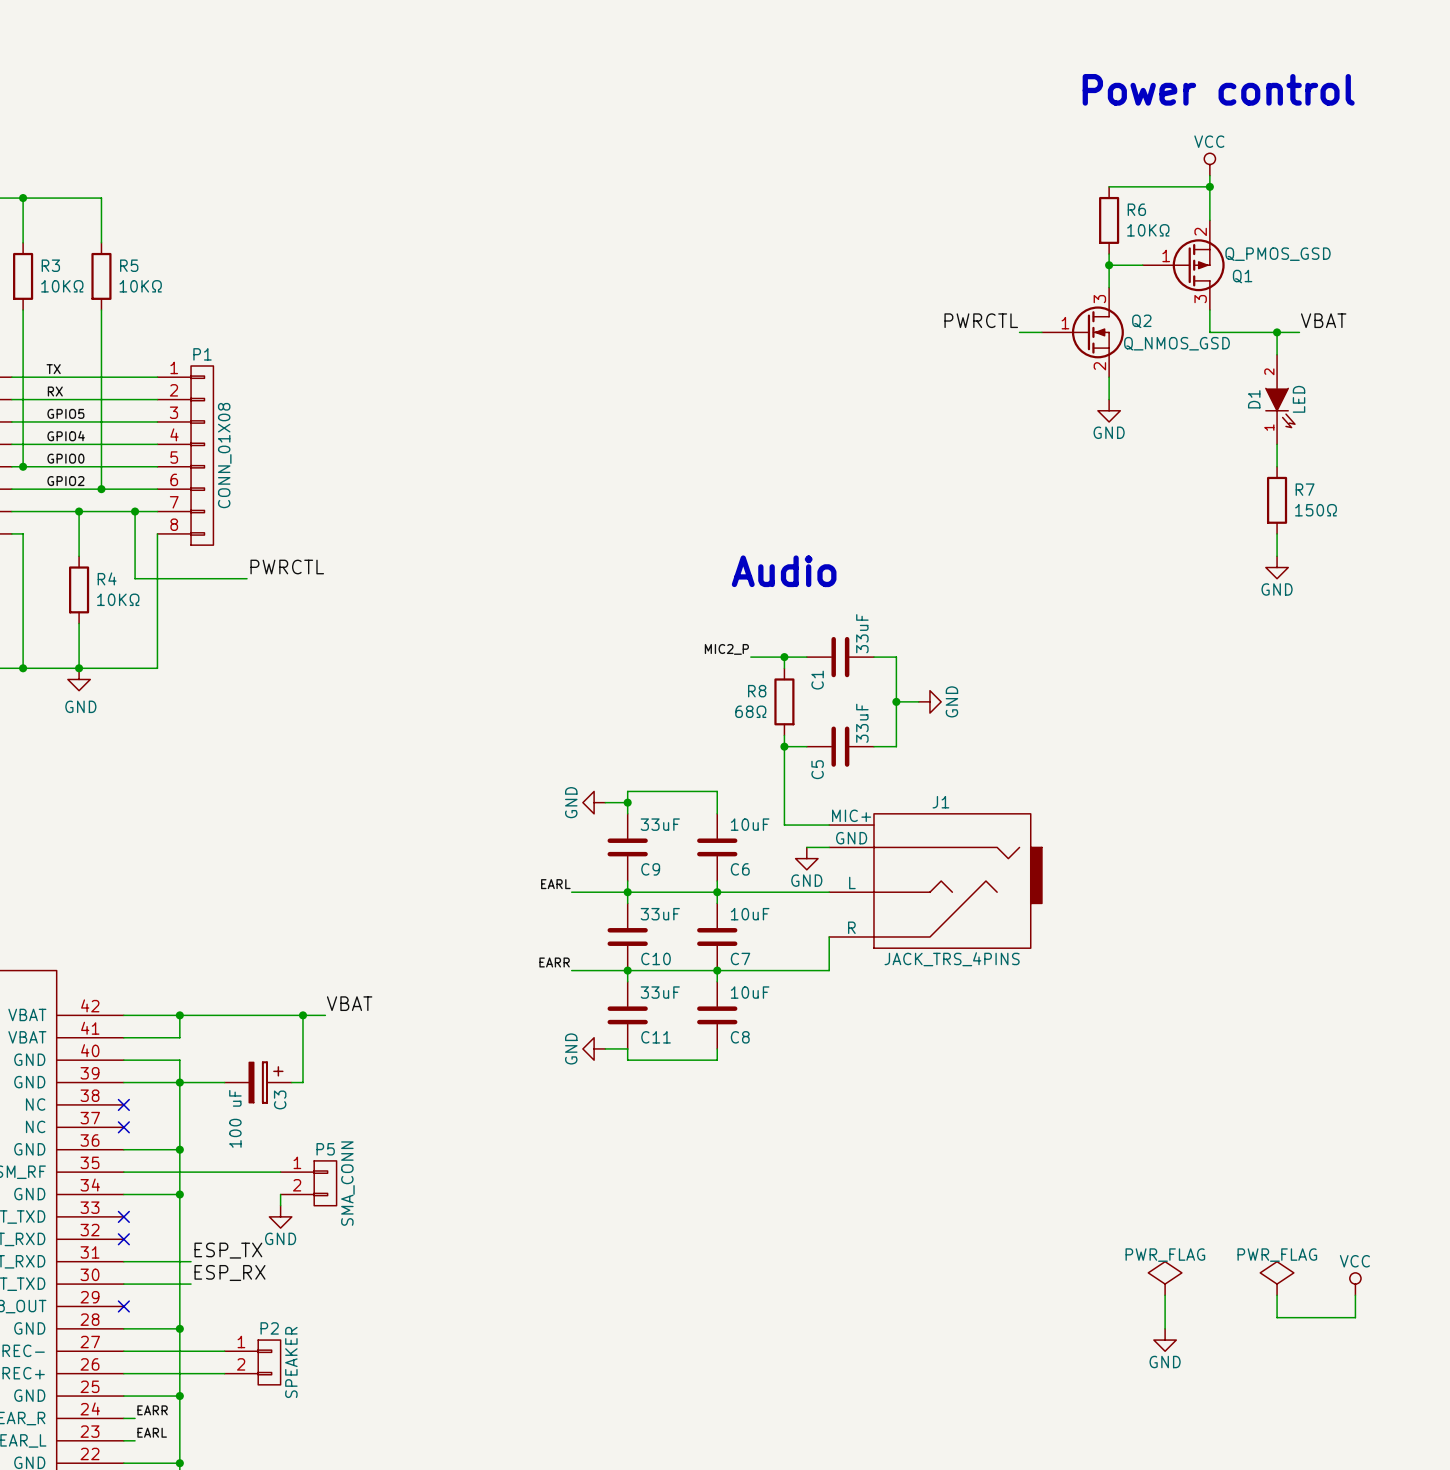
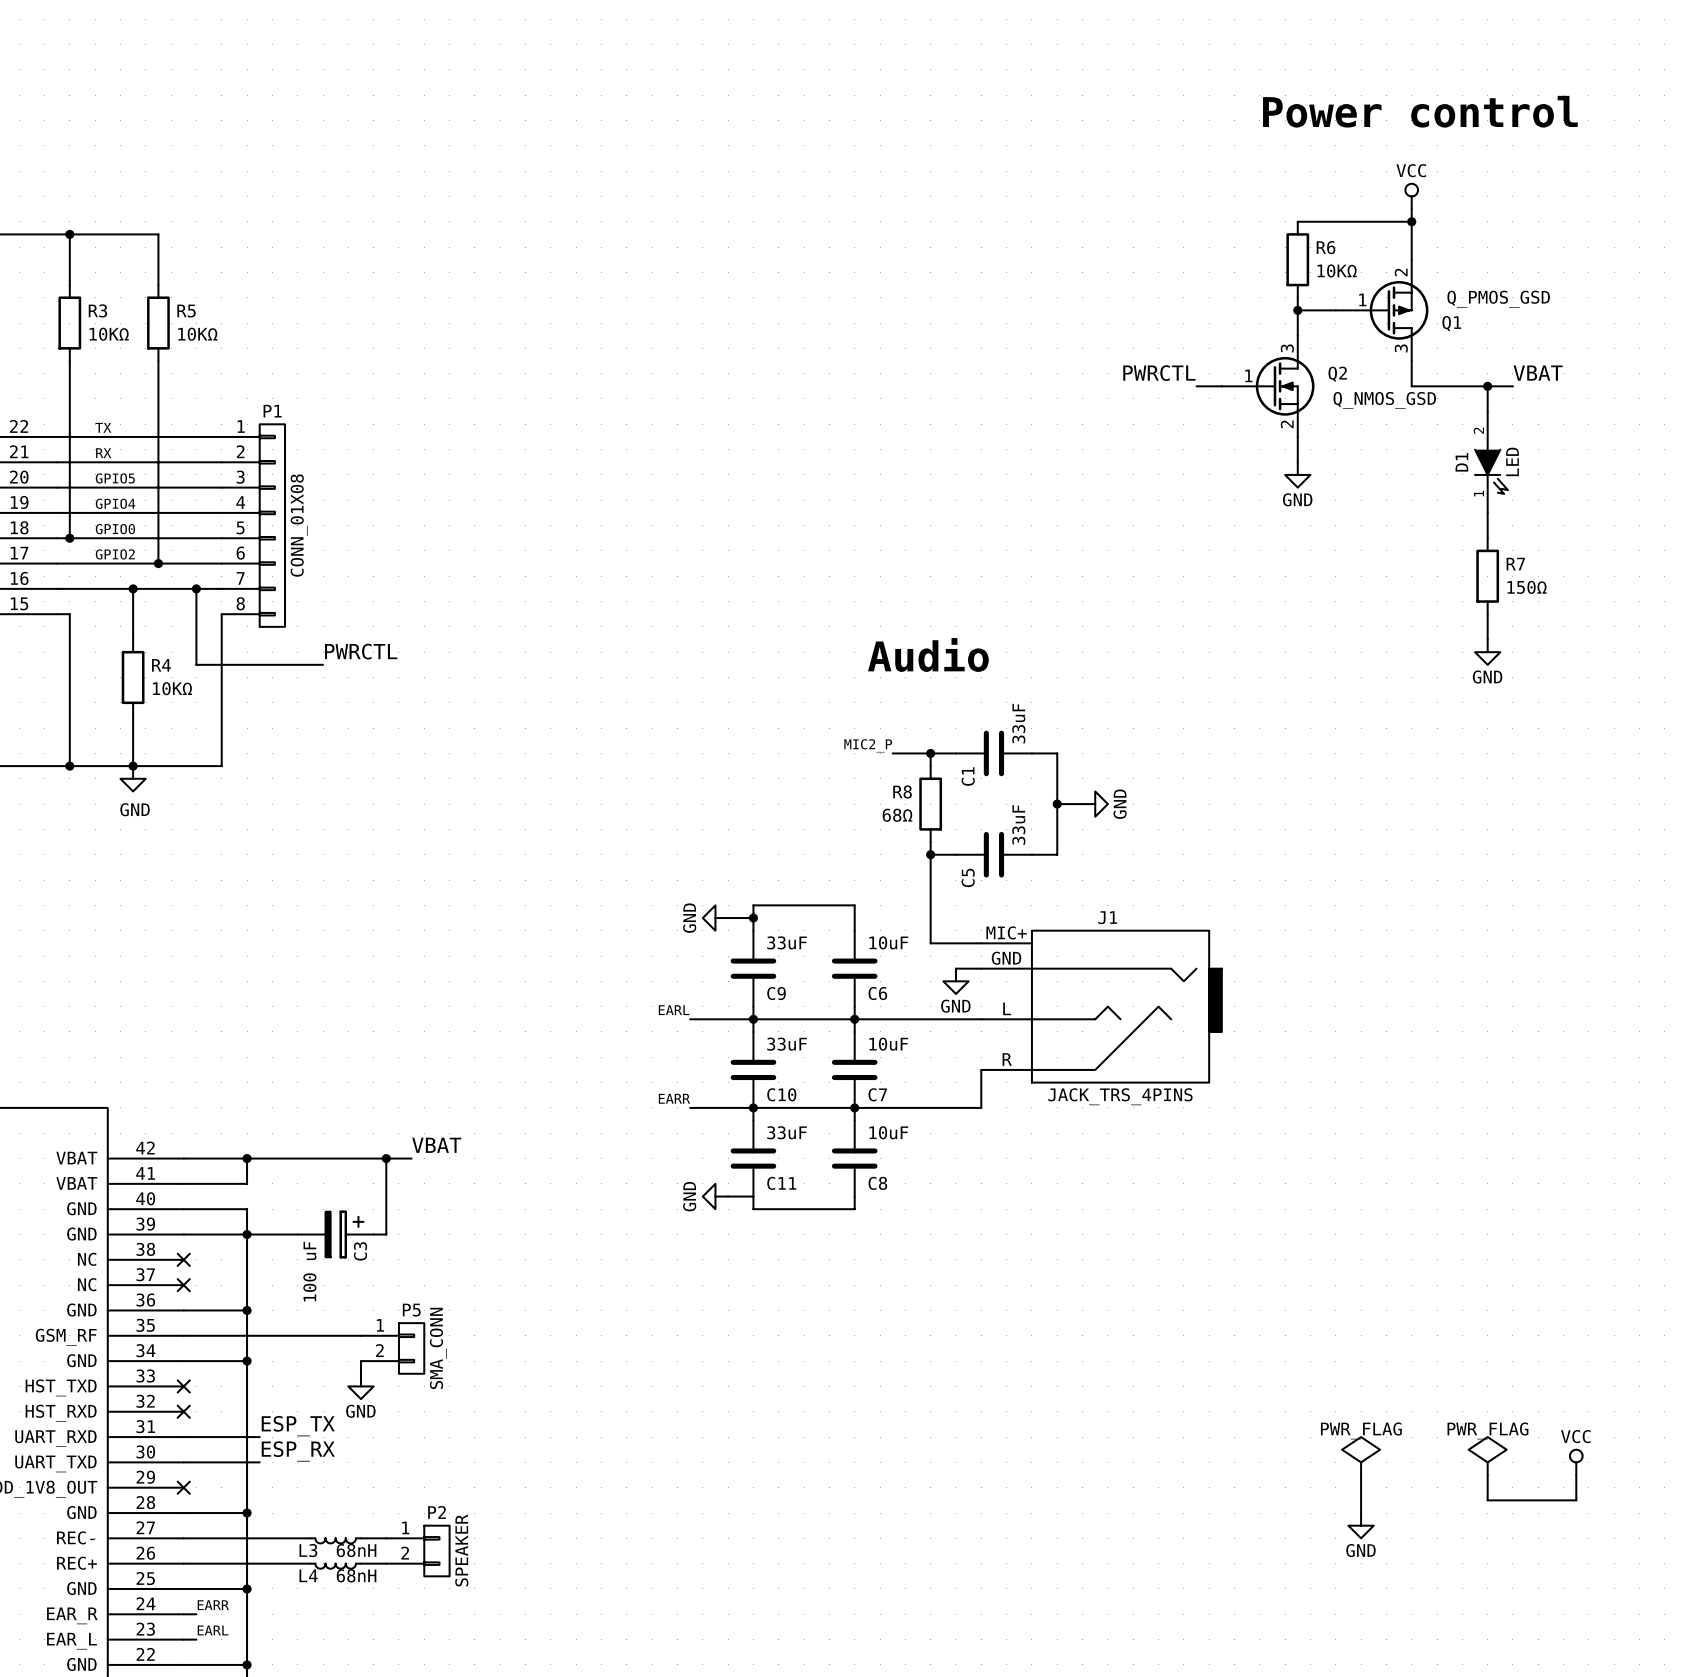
wire: none -> (360, 1538) (386, 1538)
L3: none -> 68nH (335, 1540)
P2 position: (252, 1362) -> (417, 1551)
wire: none -> (360, 1563) (386, 1563)
L4: none -> 68nH (335, 1566)

